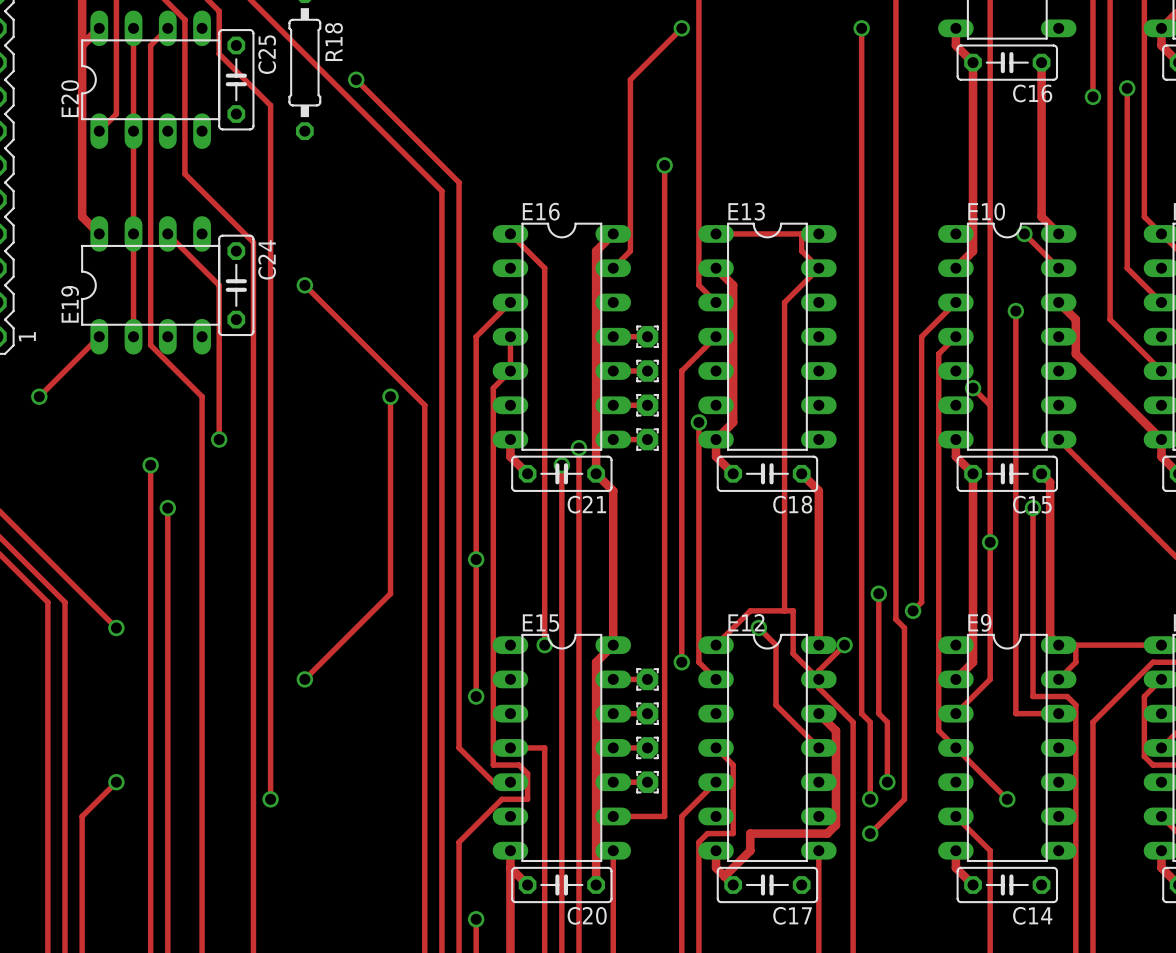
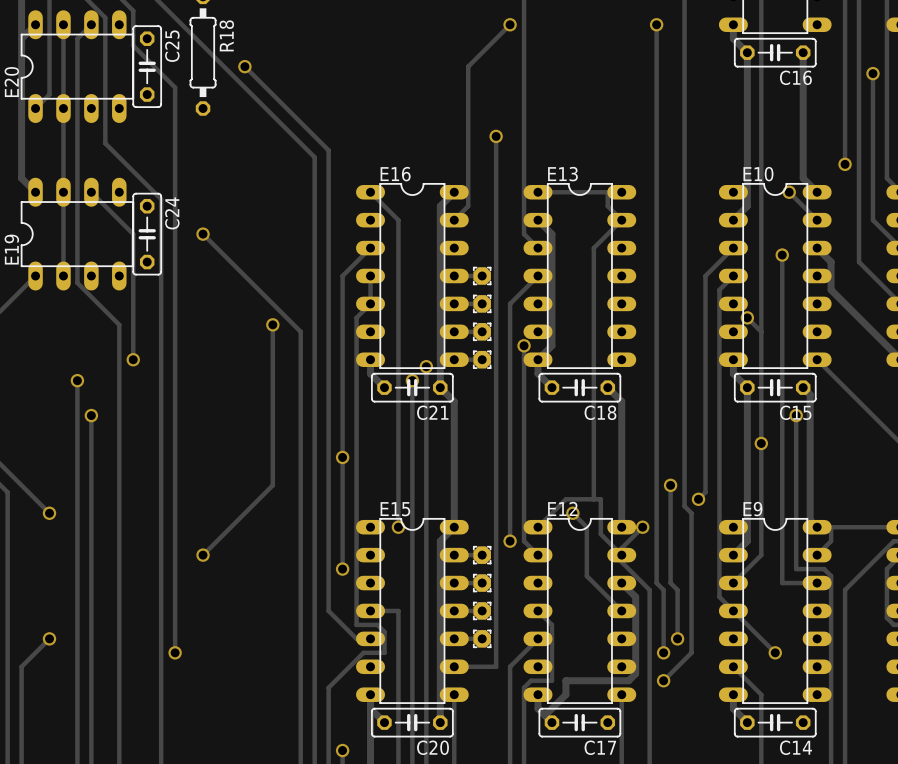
track: none -> (845, 80) (845, 164)
via: (1092, 96) -> none
via: none -> (845, 164)

